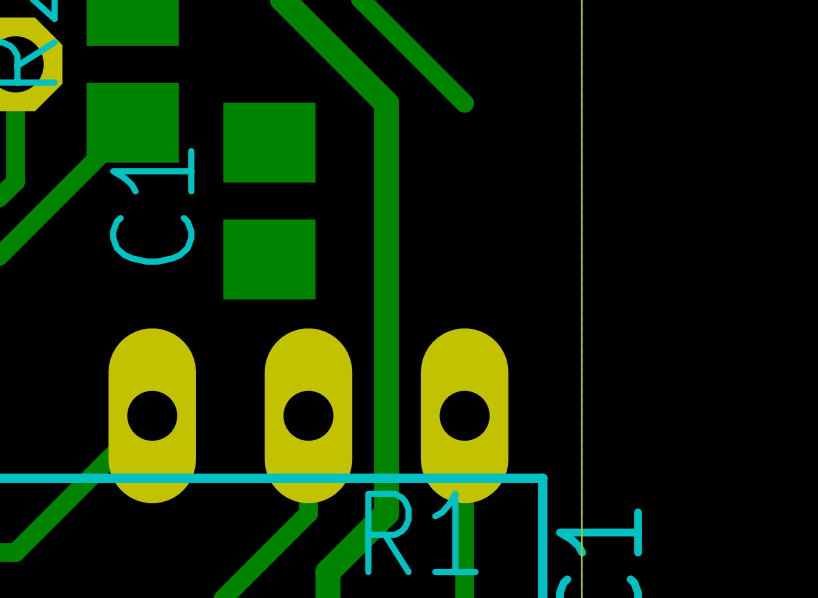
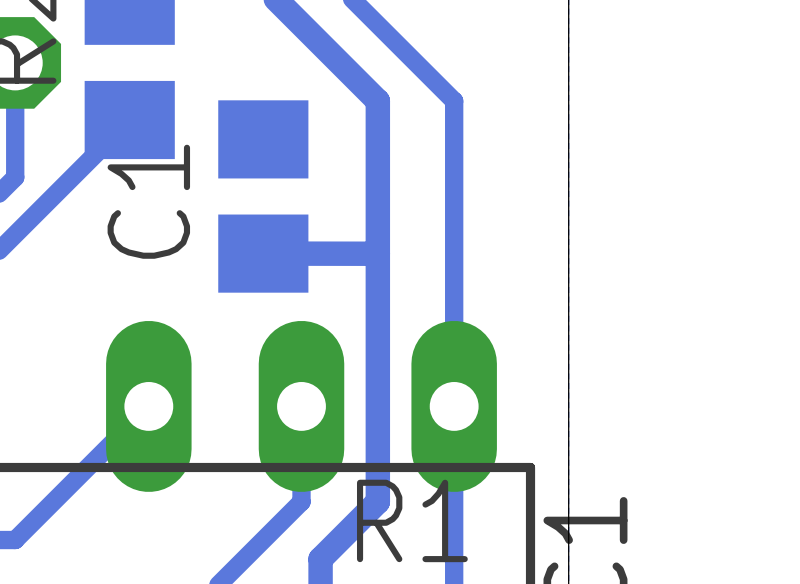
bottom track: none -> (454, 101) (454, 406)
bottom track: none -> (377, 253) (263, 253)

